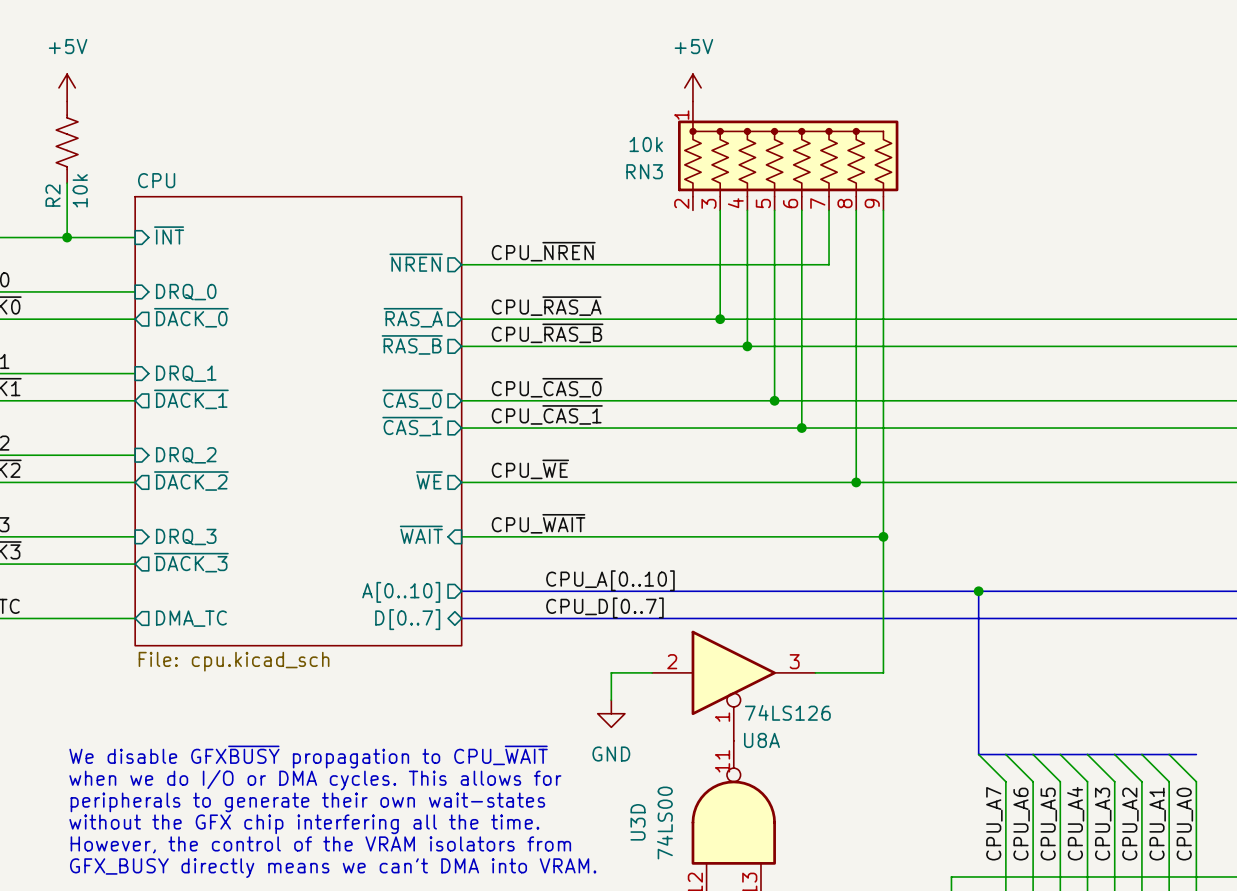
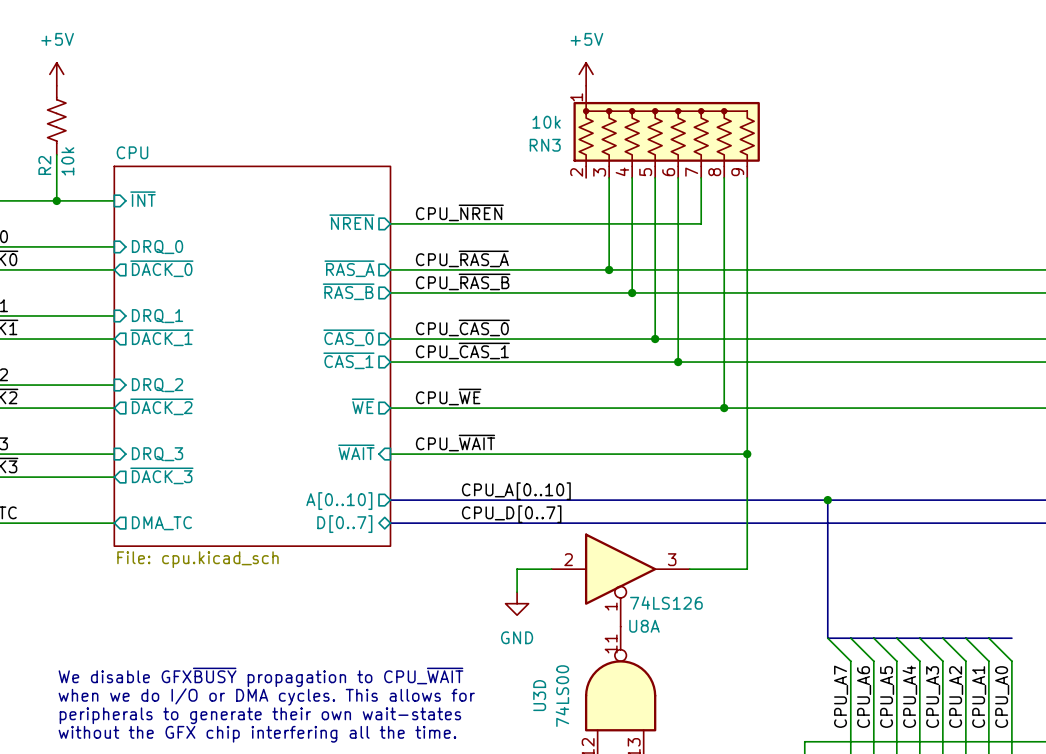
text: We disable GFX~{BUSY} propagation to CPU_~{WAIT} (308, 757) -> none
text: when we do I/O or DMA cycles. This allows for (315, 780) -> none
text: peripherals to generate their own wait-states (307, 802) -> We disable GFX~{BUSY} propagation to CPU_~{WAIT} (260, 677)
text: without the GFX chip interfering all the time. (304, 824) -> when we do I/O or DMA cycles. This allows for (266, 696)
text: However, the control of the VRAM isolators from (320, 844) -> peripherals to generate their own wait-states (260, 715)
text: GFX_BUSY directly means we can't DMA into VRAM. (333, 868) -> without the GFX chip interfering all the time. (257, 734)

